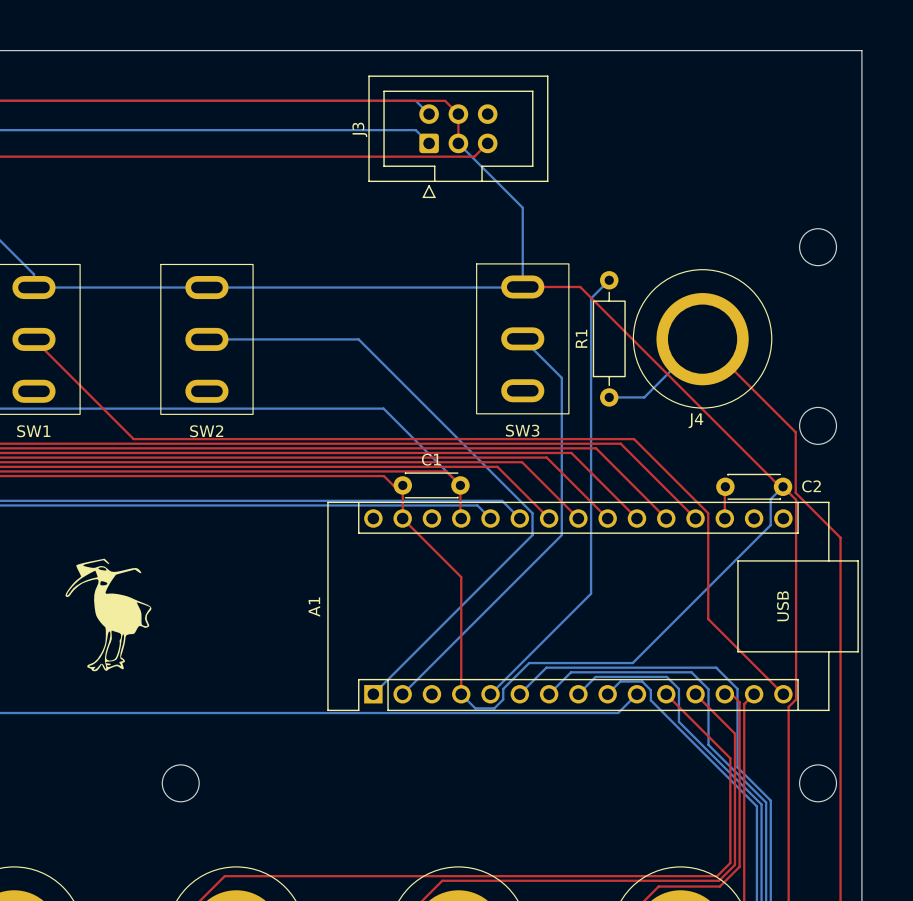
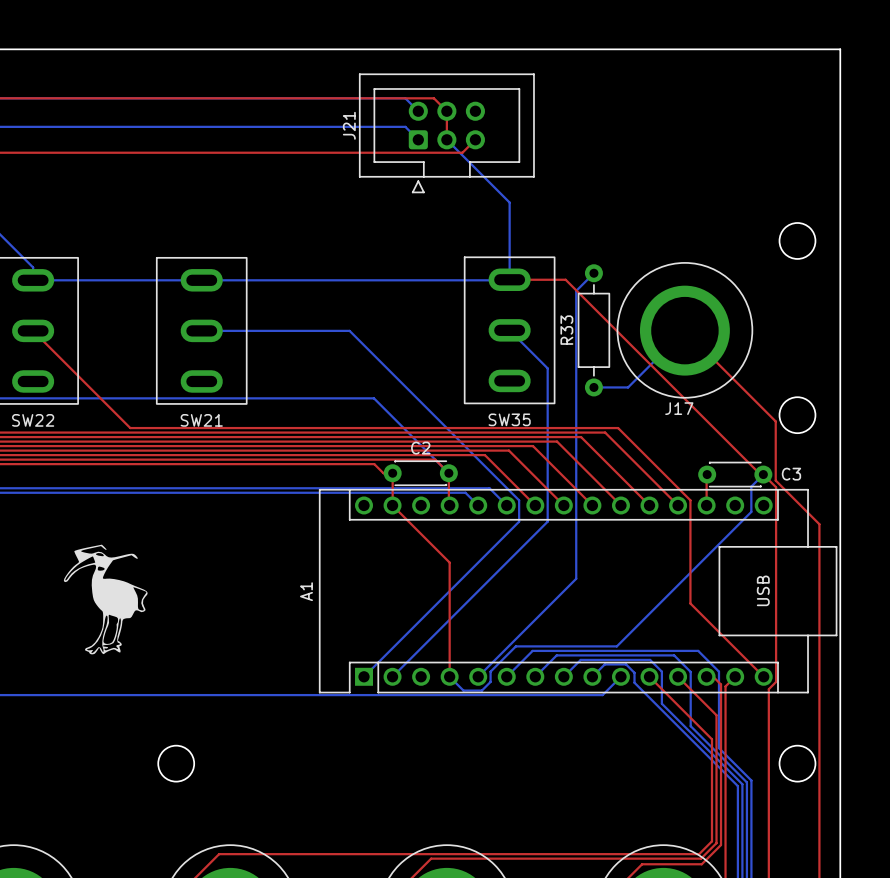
J3 name: J3 (359, 129) -> J21 (349, 125)
R1 name: R1 (581, 338) -> R33 (566, 330)
J4 name: J4 (695, 420) -> J17 (679, 408)
SW3 name: SW3 (522, 430) -> SW35 (509, 419)
SW1 name: SW1 (33, 431) -> SW22 (33, 420)
SW2 name: SW2 (206, 431) -> SW21 (201, 420)
C1 name: C1 (431, 459) -> C2 (420, 448)
C2 name: C2 (811, 486) -> C3 (791, 474)

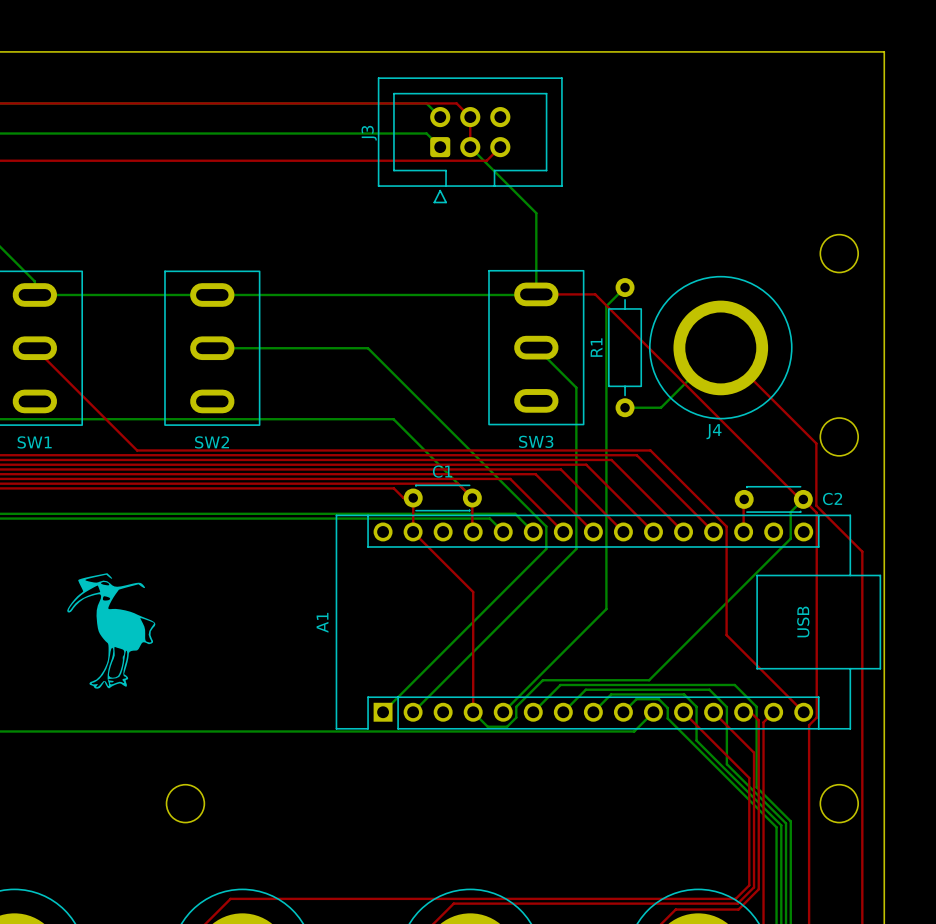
J21 name: J21 (349, 125) -> J3 (369, 133)
R33 name: R33 (566, 330) -> R1 (596, 347)
J17 name: J17 (679, 408) -> J4 (714, 431)
SW35 name: SW35 (509, 419) -> SW3 (536, 441)
SW22 name: SW22 (33, 420) -> SW1 (34, 442)
SW21 name: SW21 (201, 420) -> SW2 (212, 442)
C2 name: C2 (420, 448) -> C1 (442, 471)
C3 name: C3 (791, 474) -> C2 (832, 498)

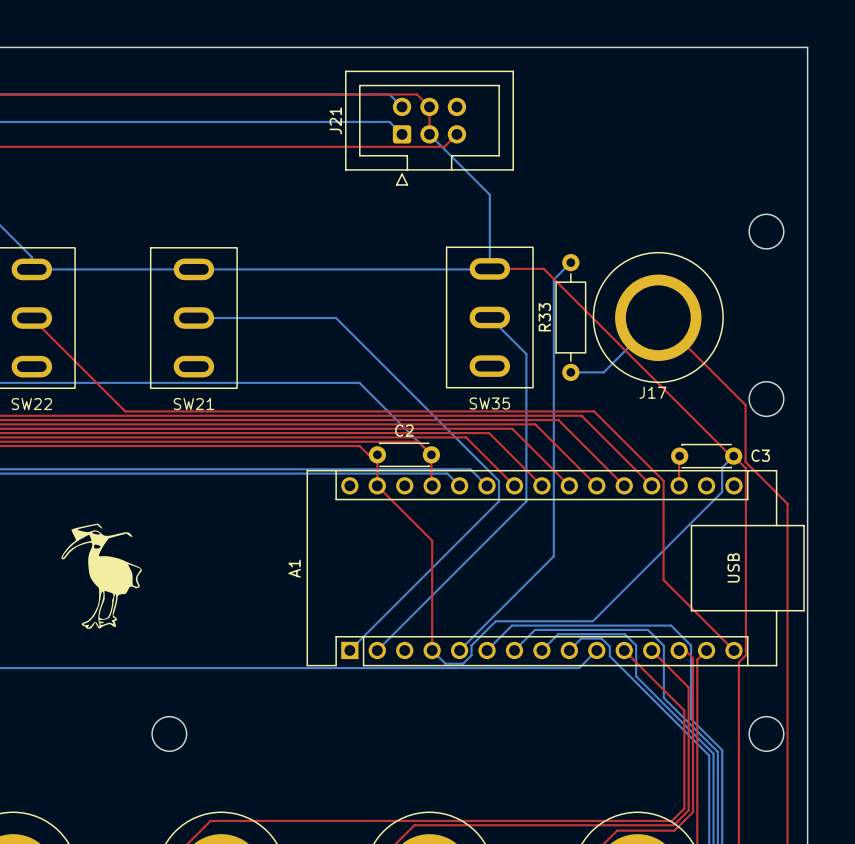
J3 name: J3 (369, 133) -> J21 (335, 120)
R1 name: R1 (596, 347) -> R33 (544, 317)
J4 name: J4 (714, 431) -> J17 (652, 392)
SW3 name: SW3 (536, 441) -> SW35 (489, 403)
SW1 name: SW1 (34, 442) -> SW22 (31, 404)
SW2 name: SW2 (212, 442) -> SW21 (193, 404)
C1 name: C1 (442, 471) -> C2 (404, 430)
C2 name: C2 (832, 498) -> C3 (760, 455)

